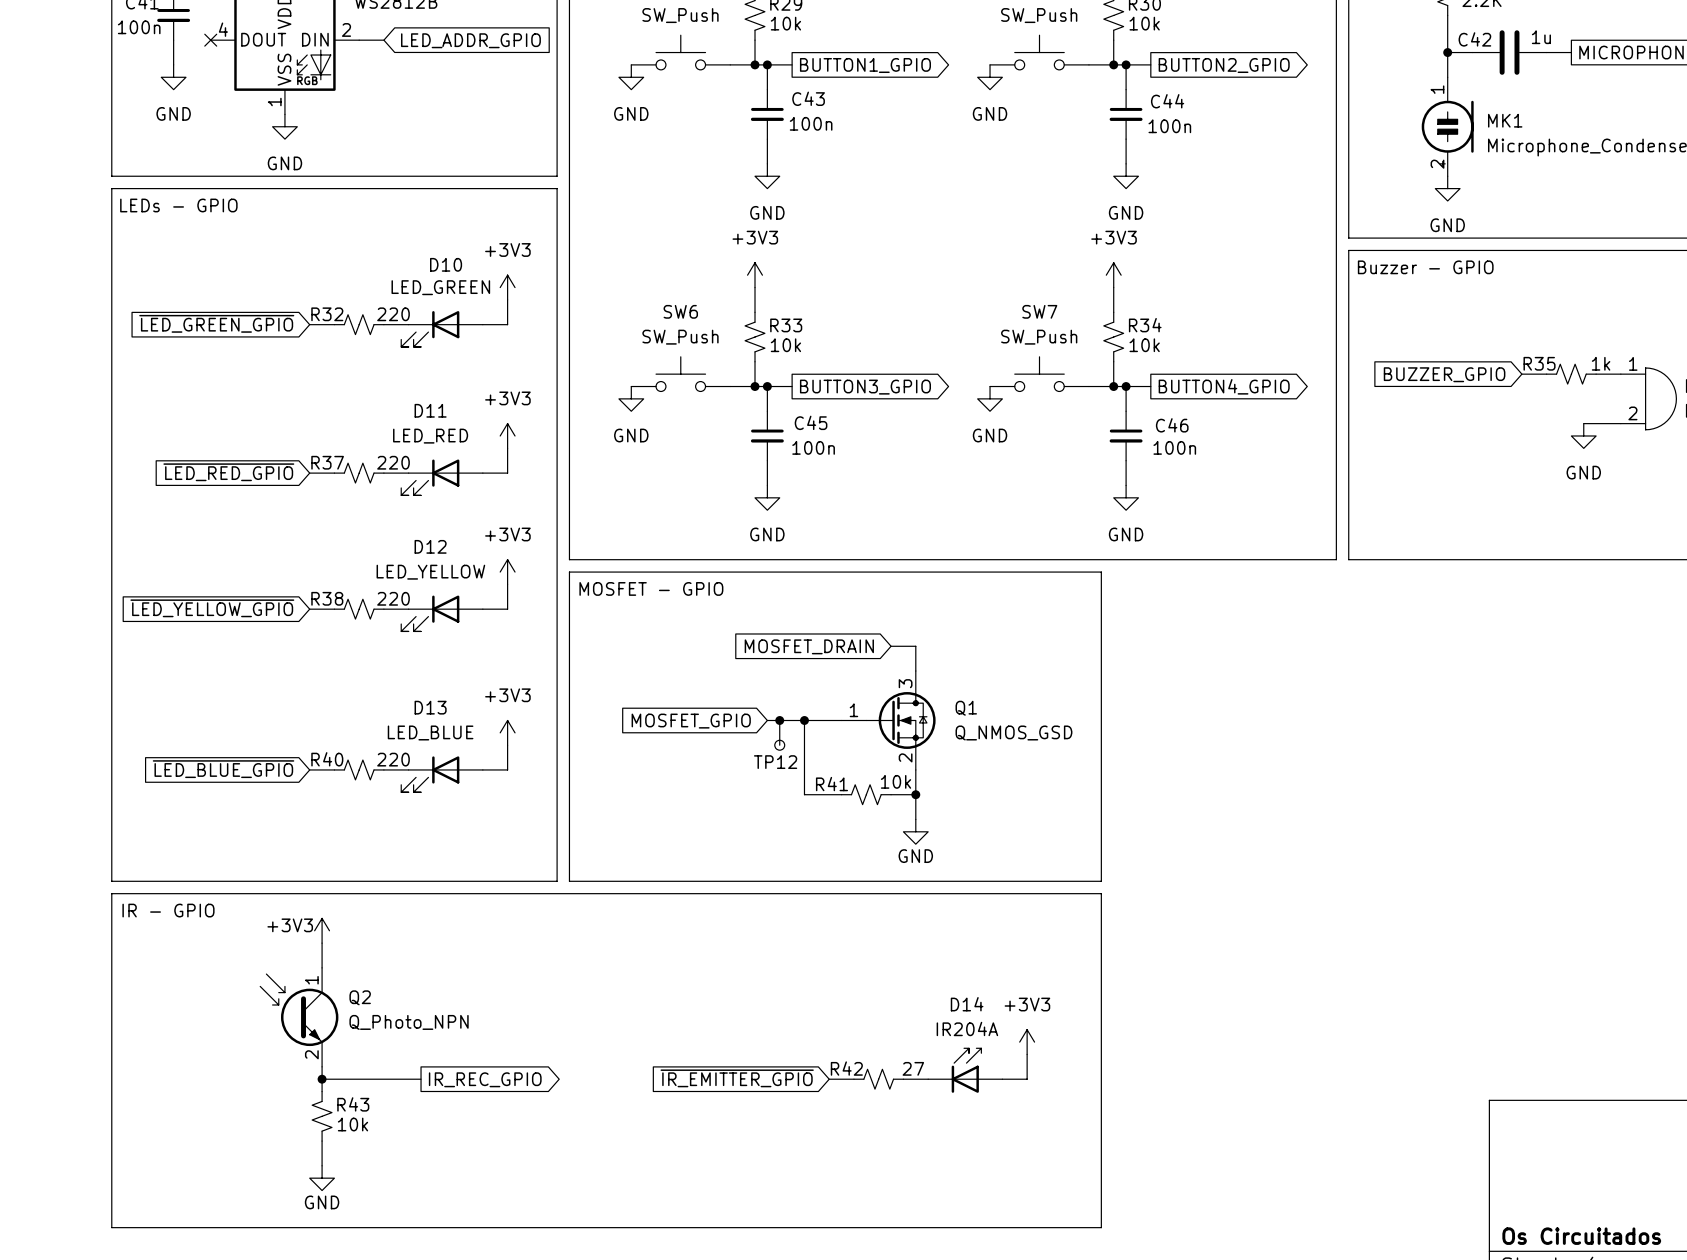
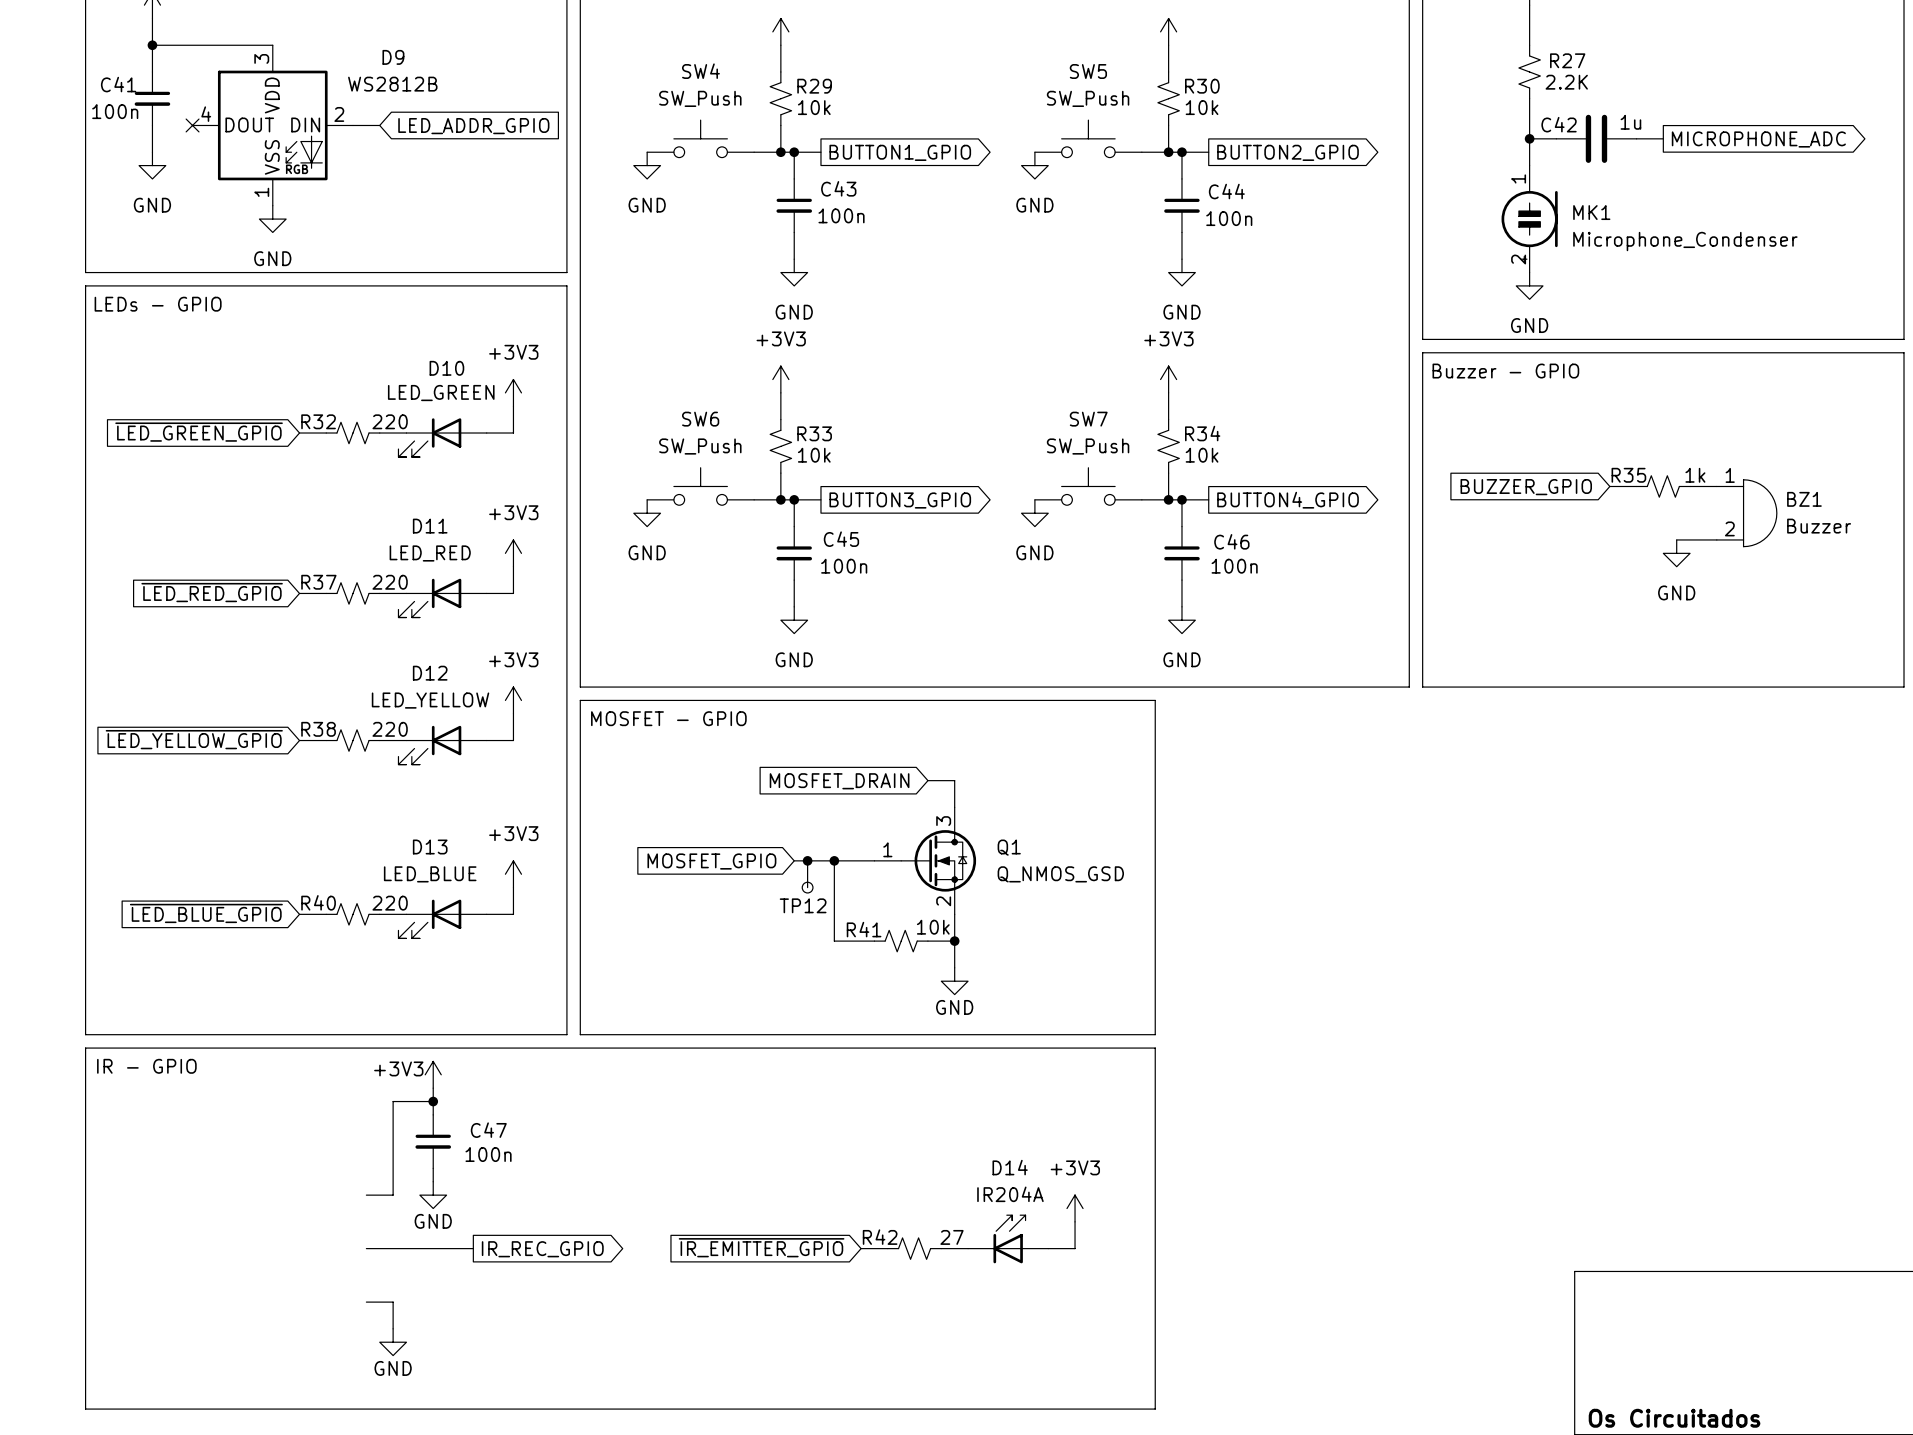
power symbol position: +3V3 (322, 930) -> +3V3 (433, 1074)
wire: (322, 943) (322, 967) -> (433, 1088) (433, 1114)
wire: none -> (433, 1101) (393, 1101) (393, 1195) (366, 1195)
junction: none -> (433, 1101)
C47: none -> 100n (433, 1141)
wire: none -> (433, 1168) (433, 1181)
Q2: Q_Photo_NPN (299, 1017) -> none
power symbol: none -> GND (433, 1195)
wire: (322, 1066) (322, 1091) -> none
wire: (322, 1079) (371, 1079) -> (419, 1248) (473, 1248)
junction: (322, 1079) -> none
global label position: IR_REC_GPIO (485, 1079) -> IR_REC_GPIO (542, 1249)
R43: 10k (322, 1116) -> none
wire: none -> (366, 1302) (393, 1302) (393, 1328)
wire: (322, 1141) (322, 1165) -> none
power symbol position: GND (322, 1178) -> GND (393, 1342)

